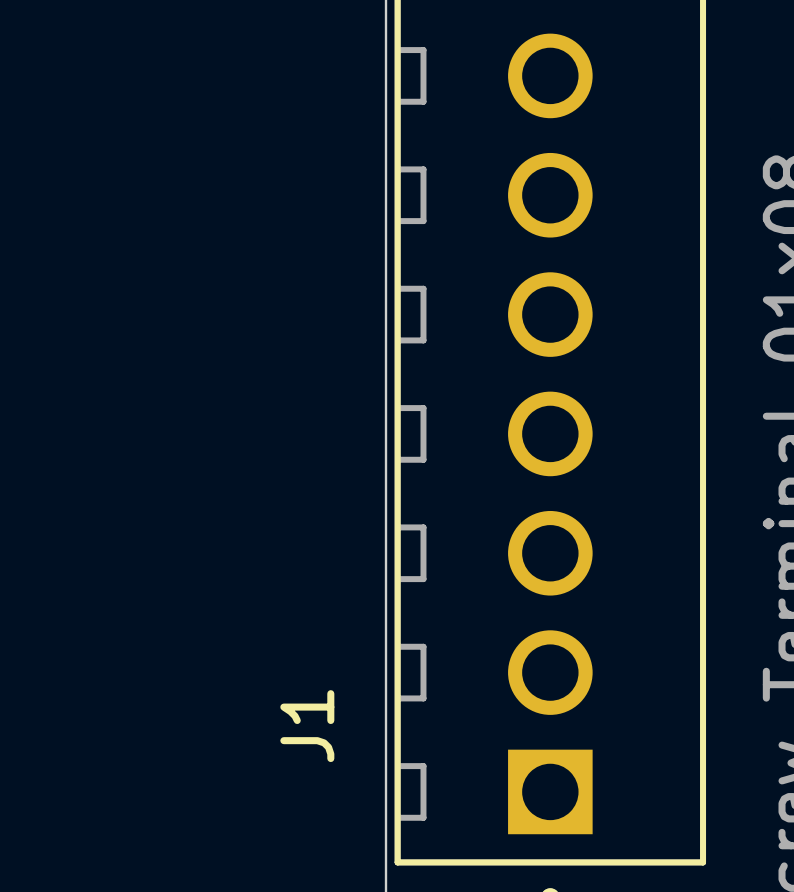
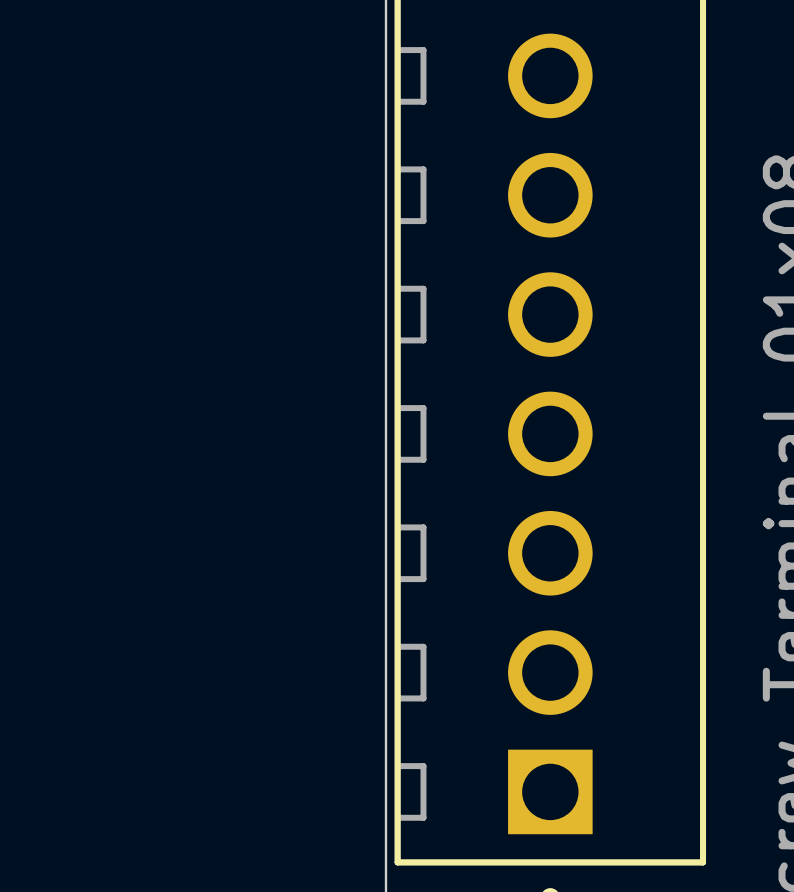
J1 name: J1 (307, 726) -> none

